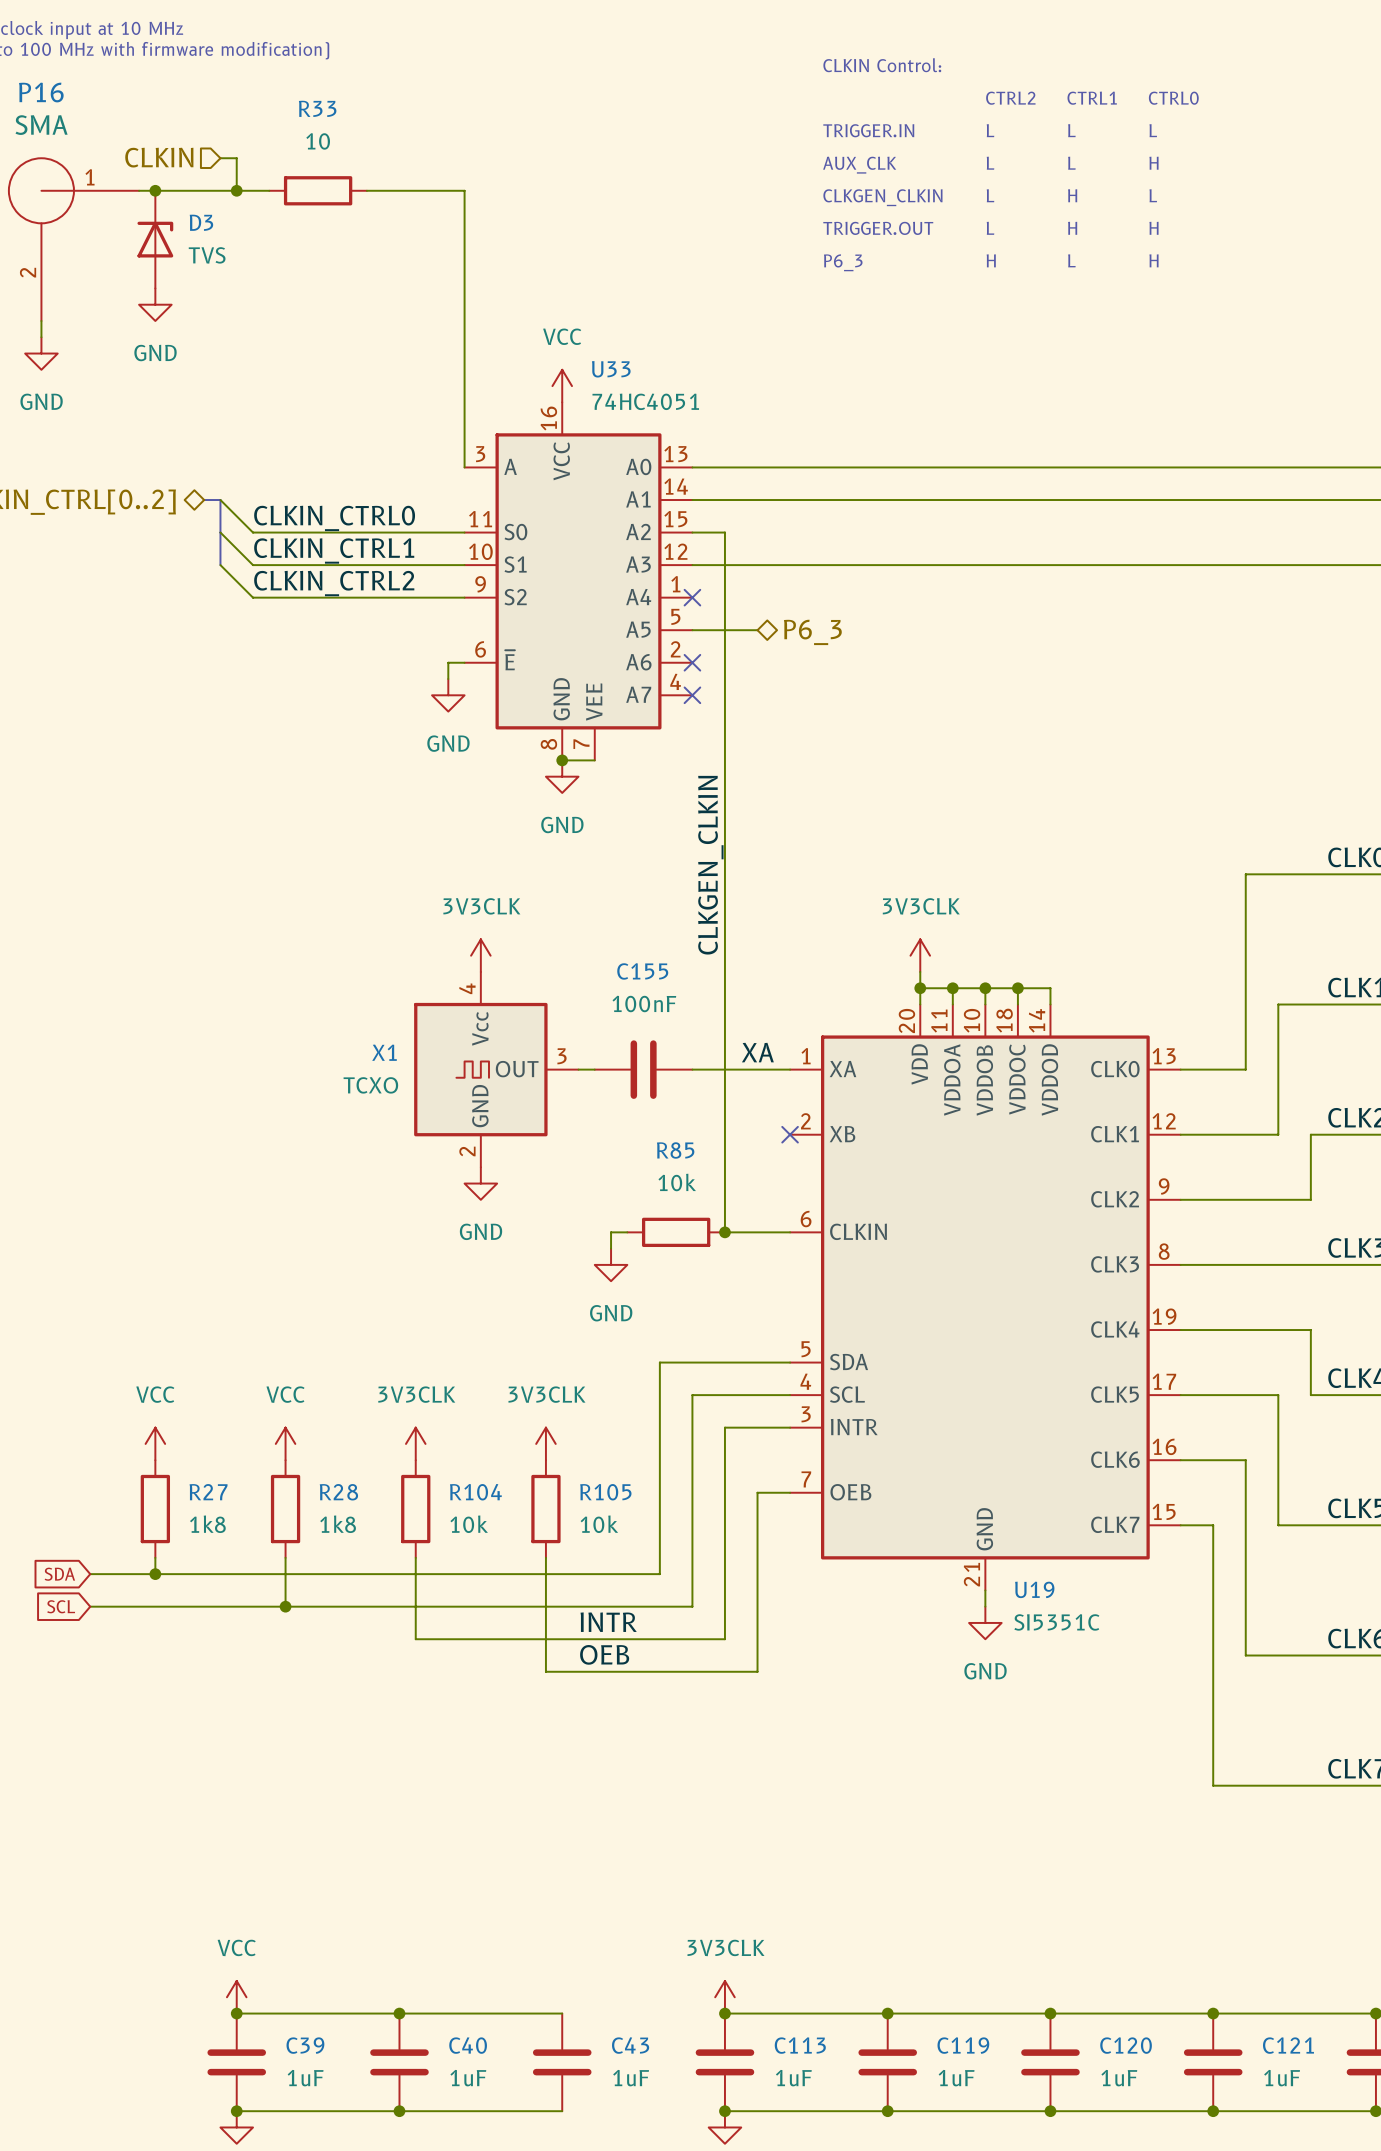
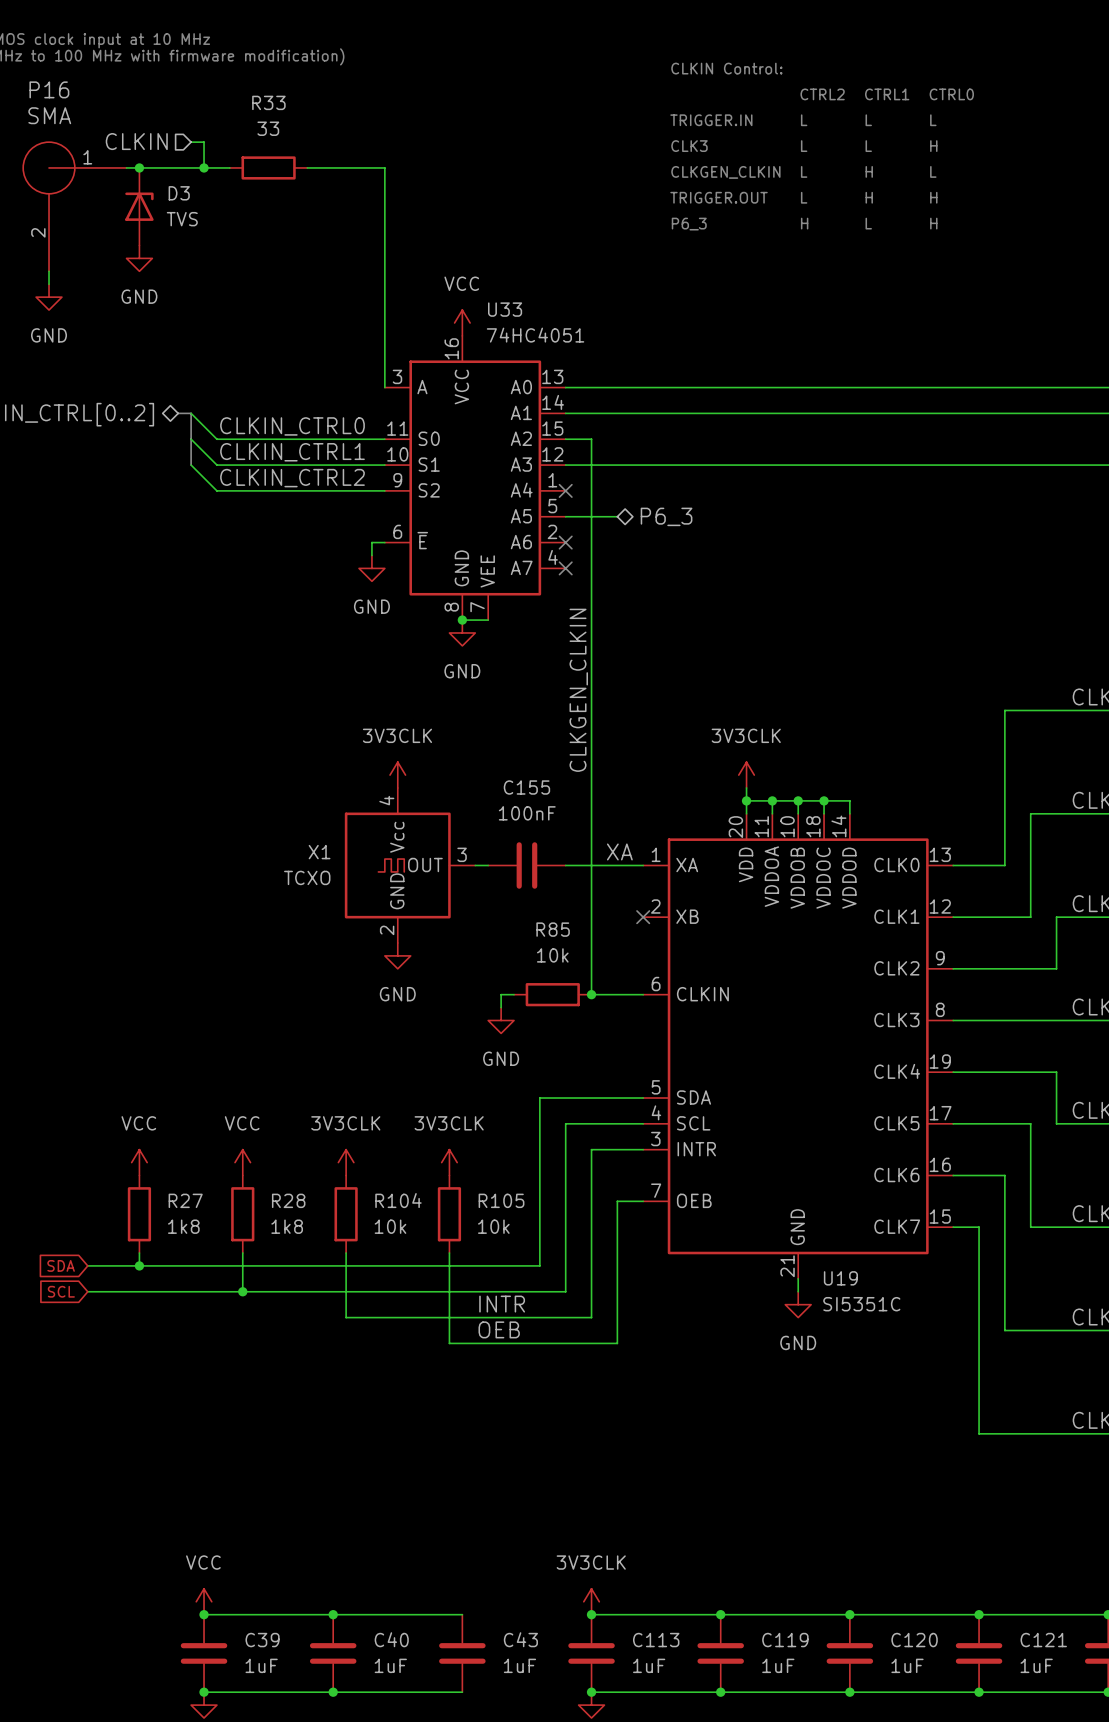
R33 value: 10 (318, 141) -> 33 (268, 128)
text: AUX_CLK (859, 165) -> CLK3 (689, 146)

